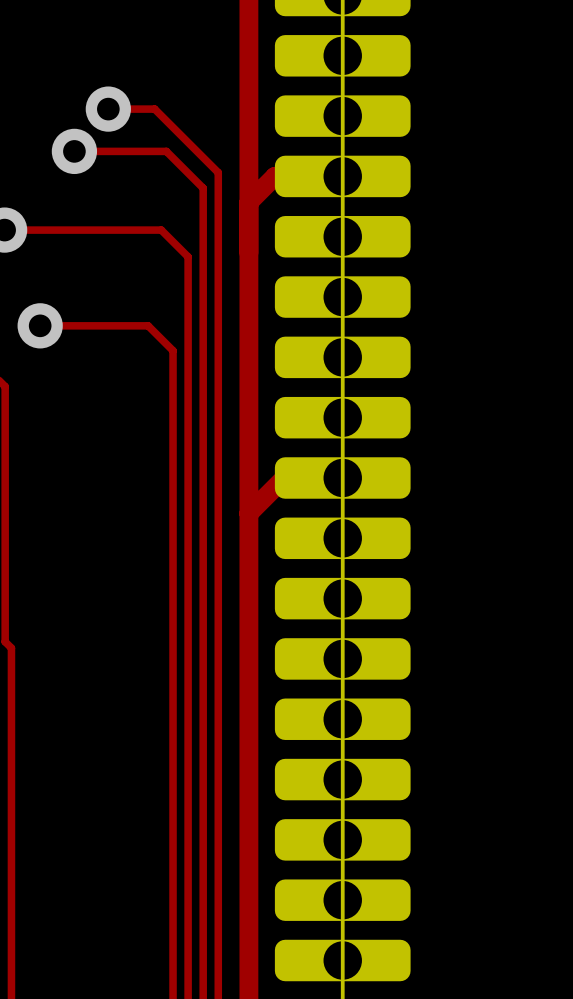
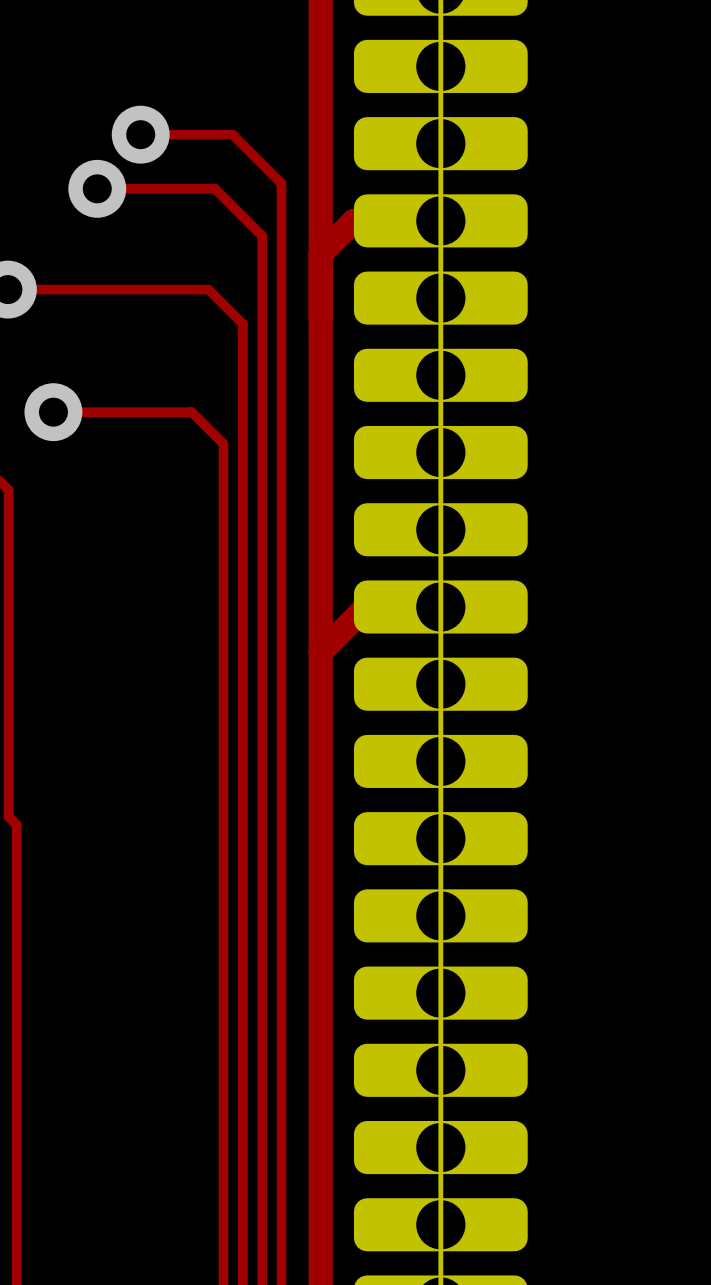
track: (154, 109) (218, 172) -> (200, 134) (232, 134) (281, 183) (281, 216)

